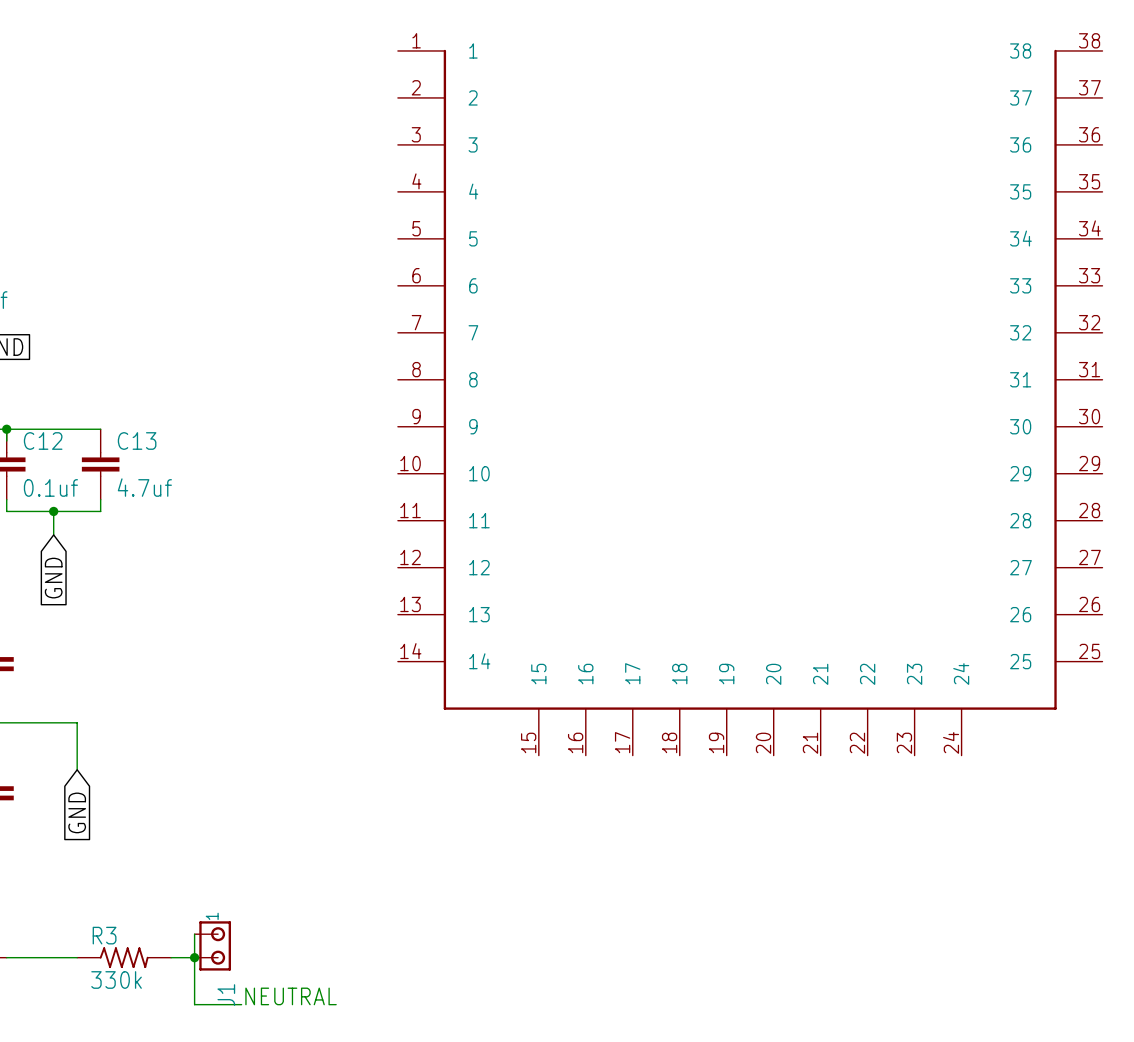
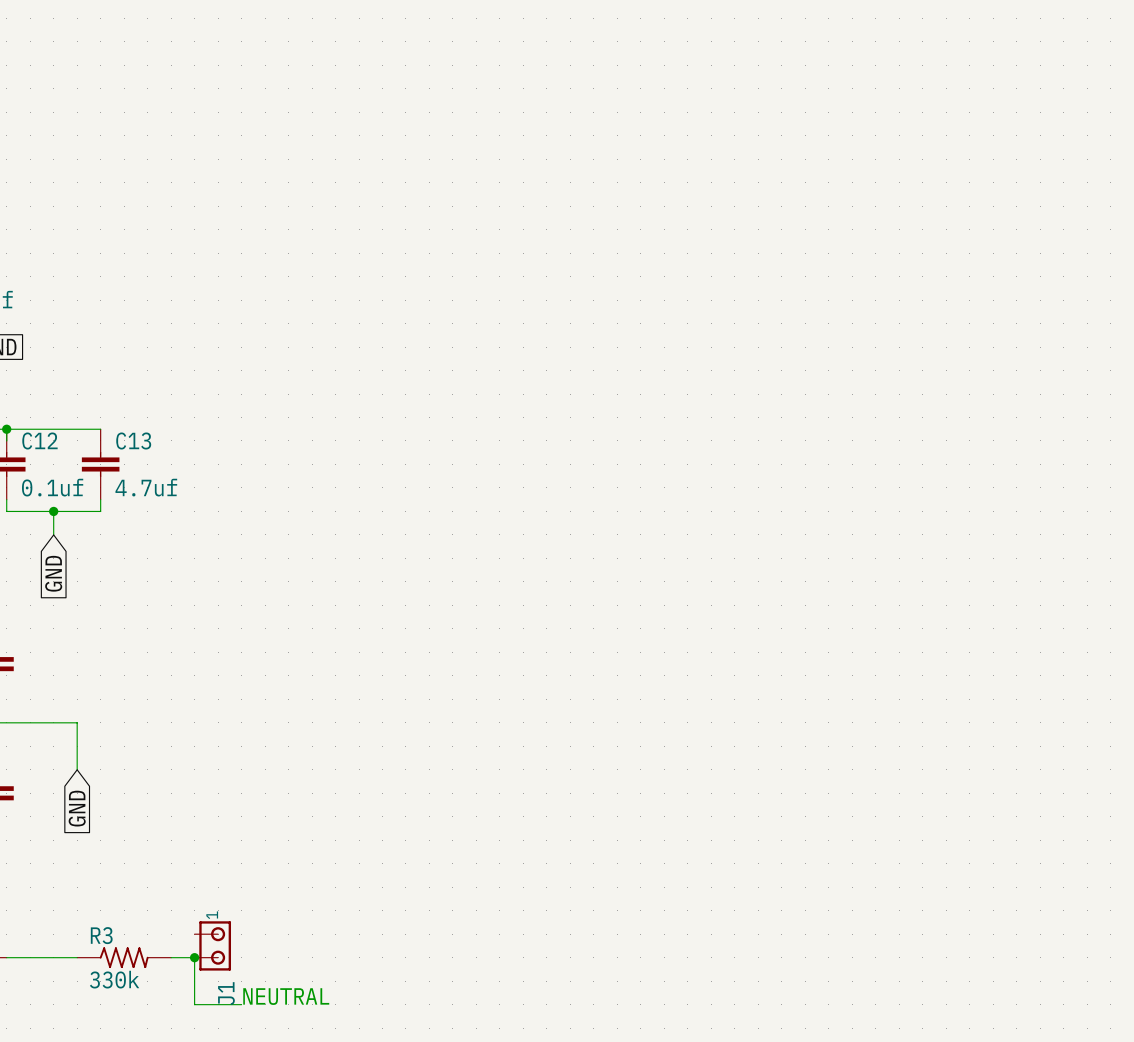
part: (750, 402) -> none
wire: (194, 934) (194, 957) -> none

